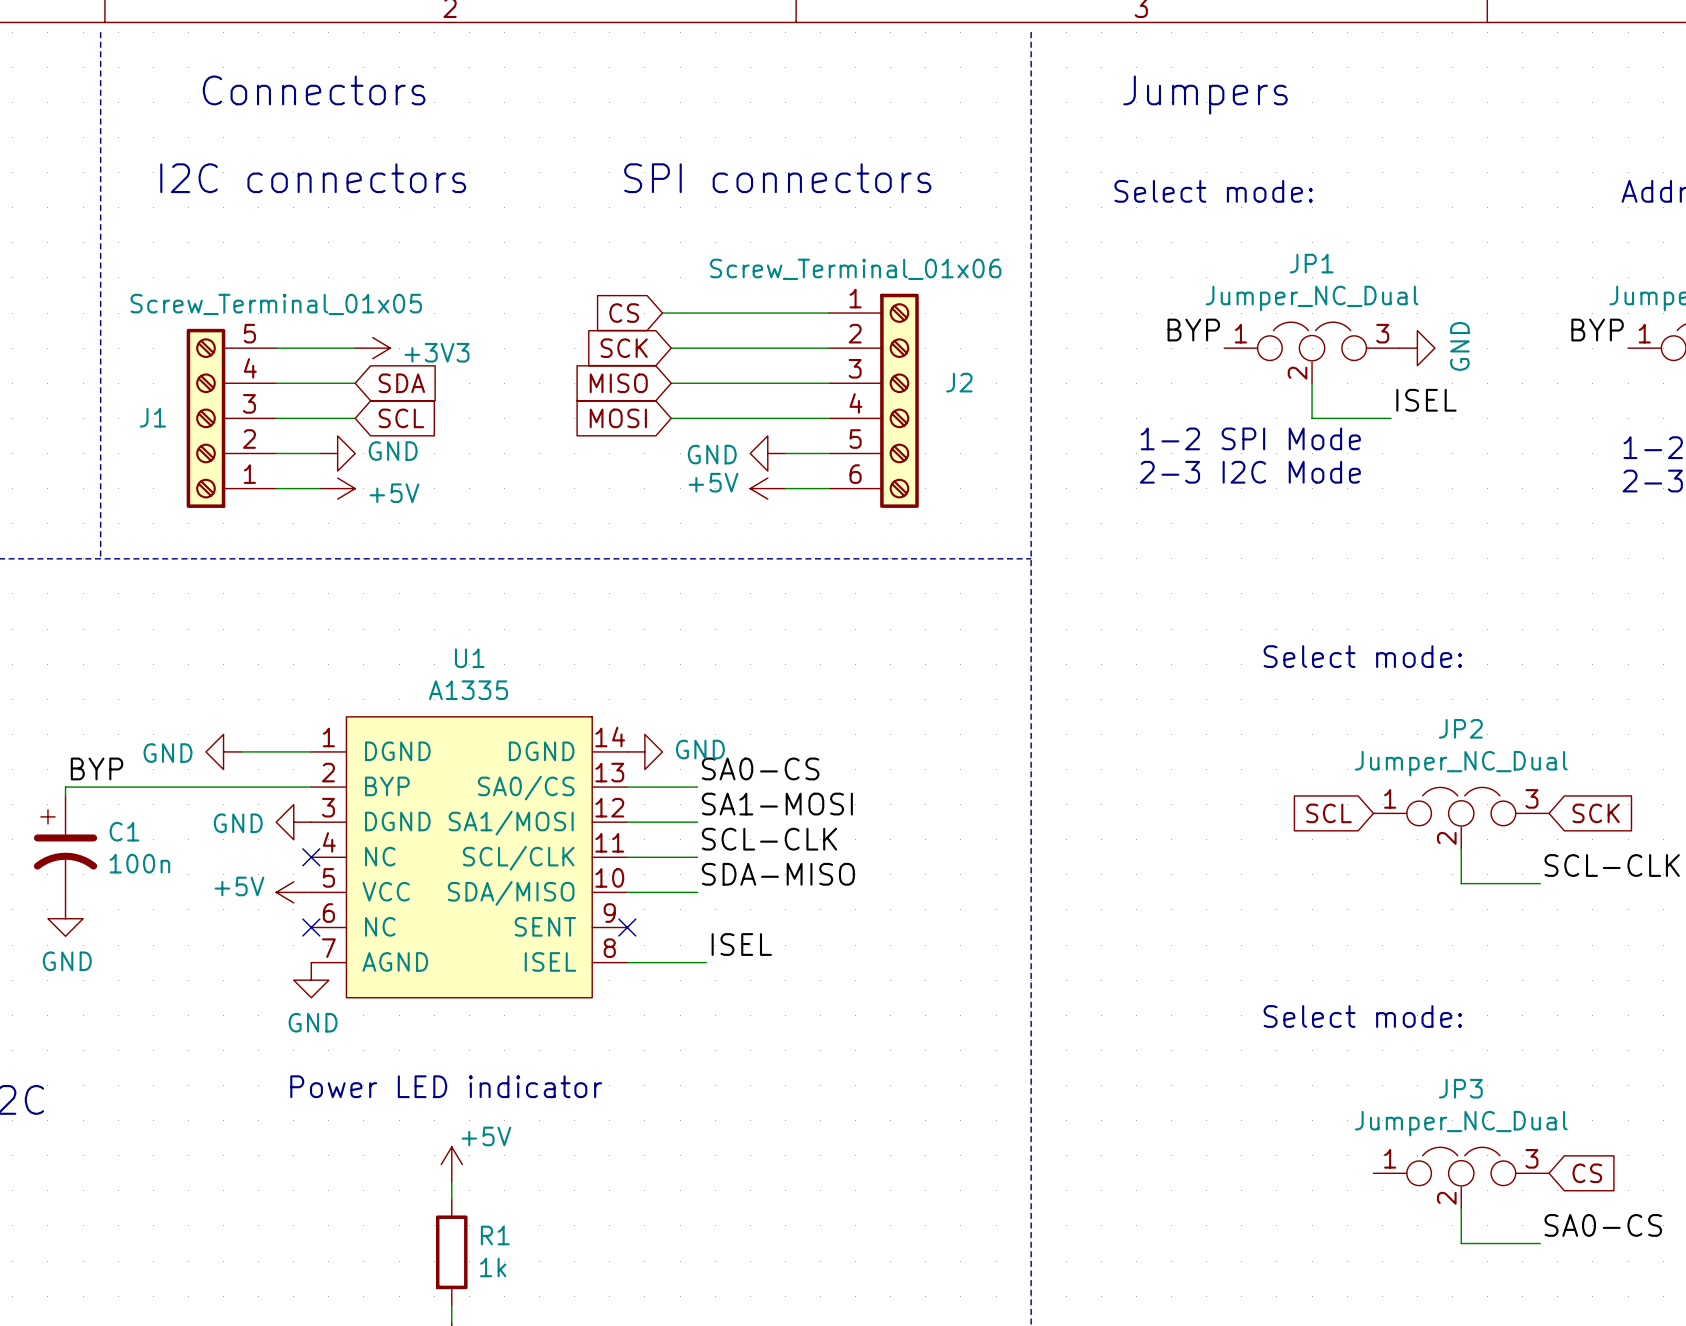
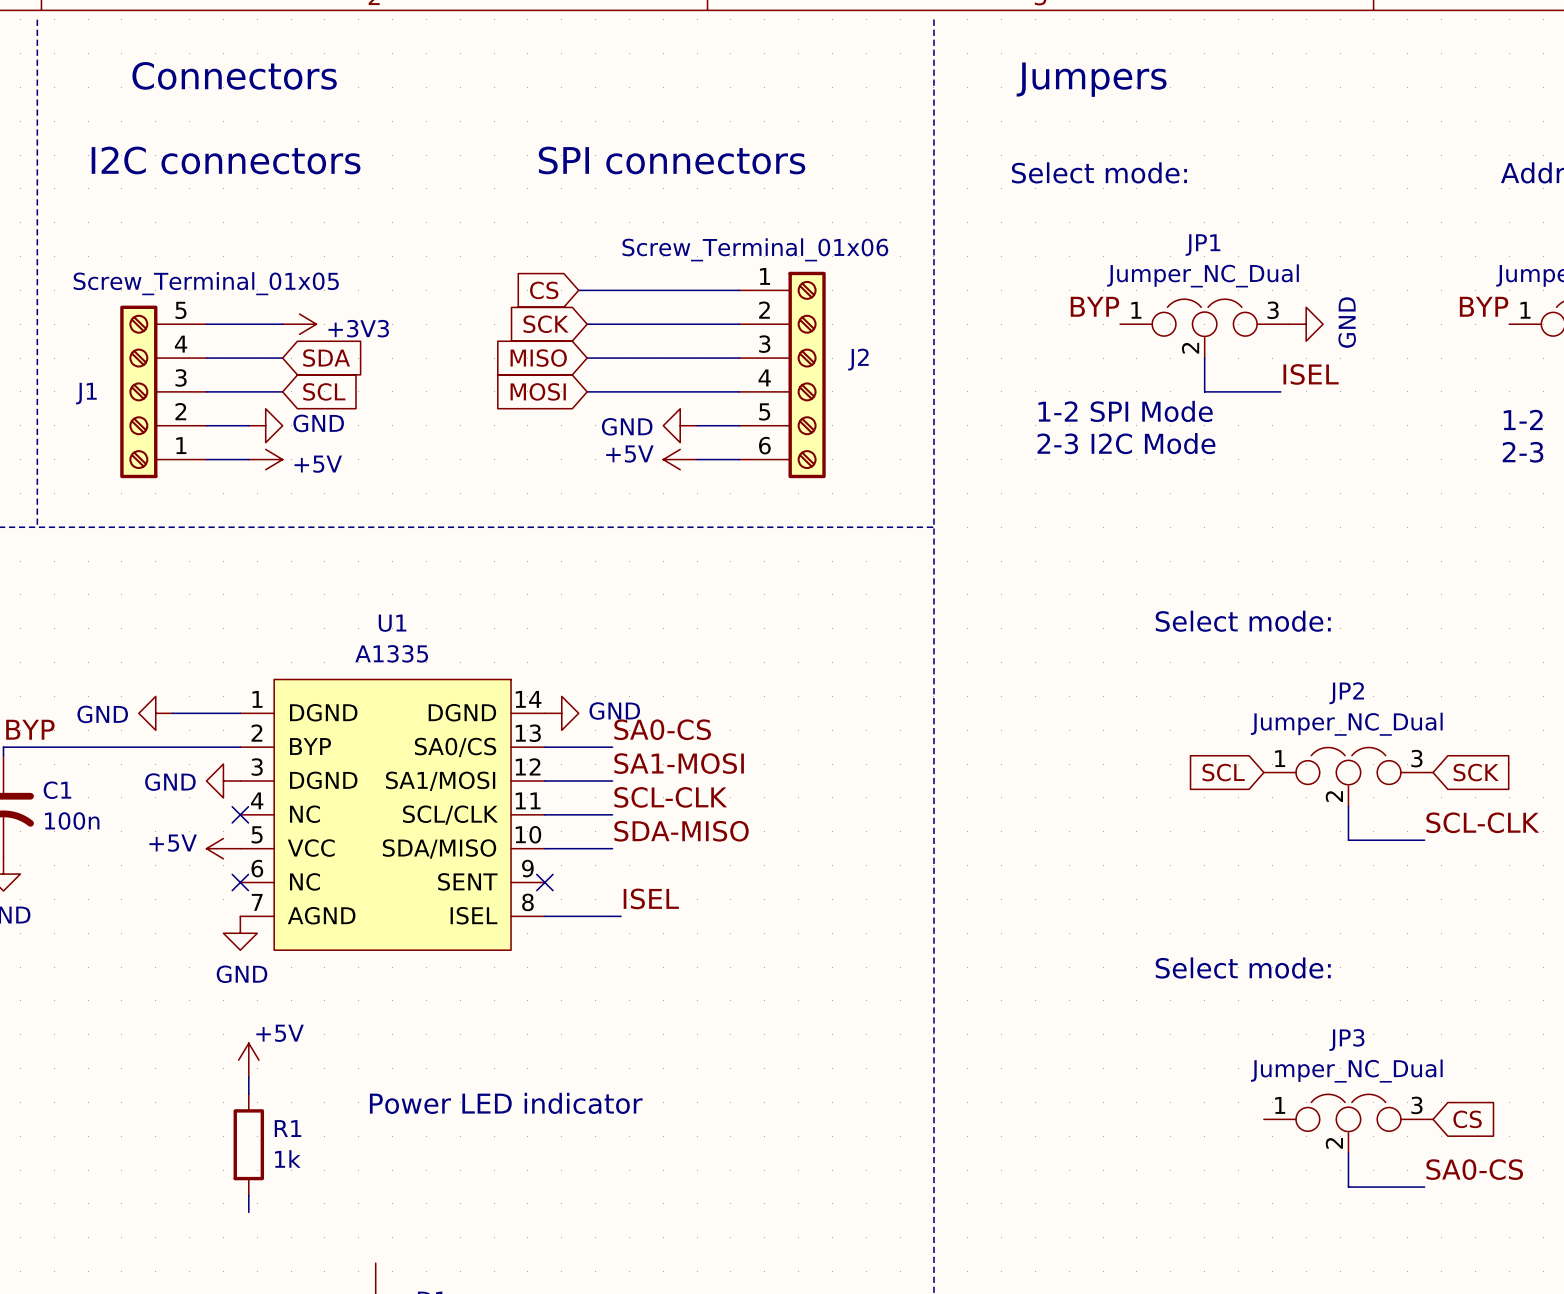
text position: Power LED indicator (446, 1086) -> Power LED indicator (506, 1103)
power symbol position: +5V (451, 1164) -> +5V (248, 1060)
wire: (451, 1182) (451, 1199) -> (248, 1077) (248, 1093)
R1 position: (451, 1252) -> (248, 1144)
wire: (451, 1304) (451, 1322) -> (248, 1195) (248, 1212)

